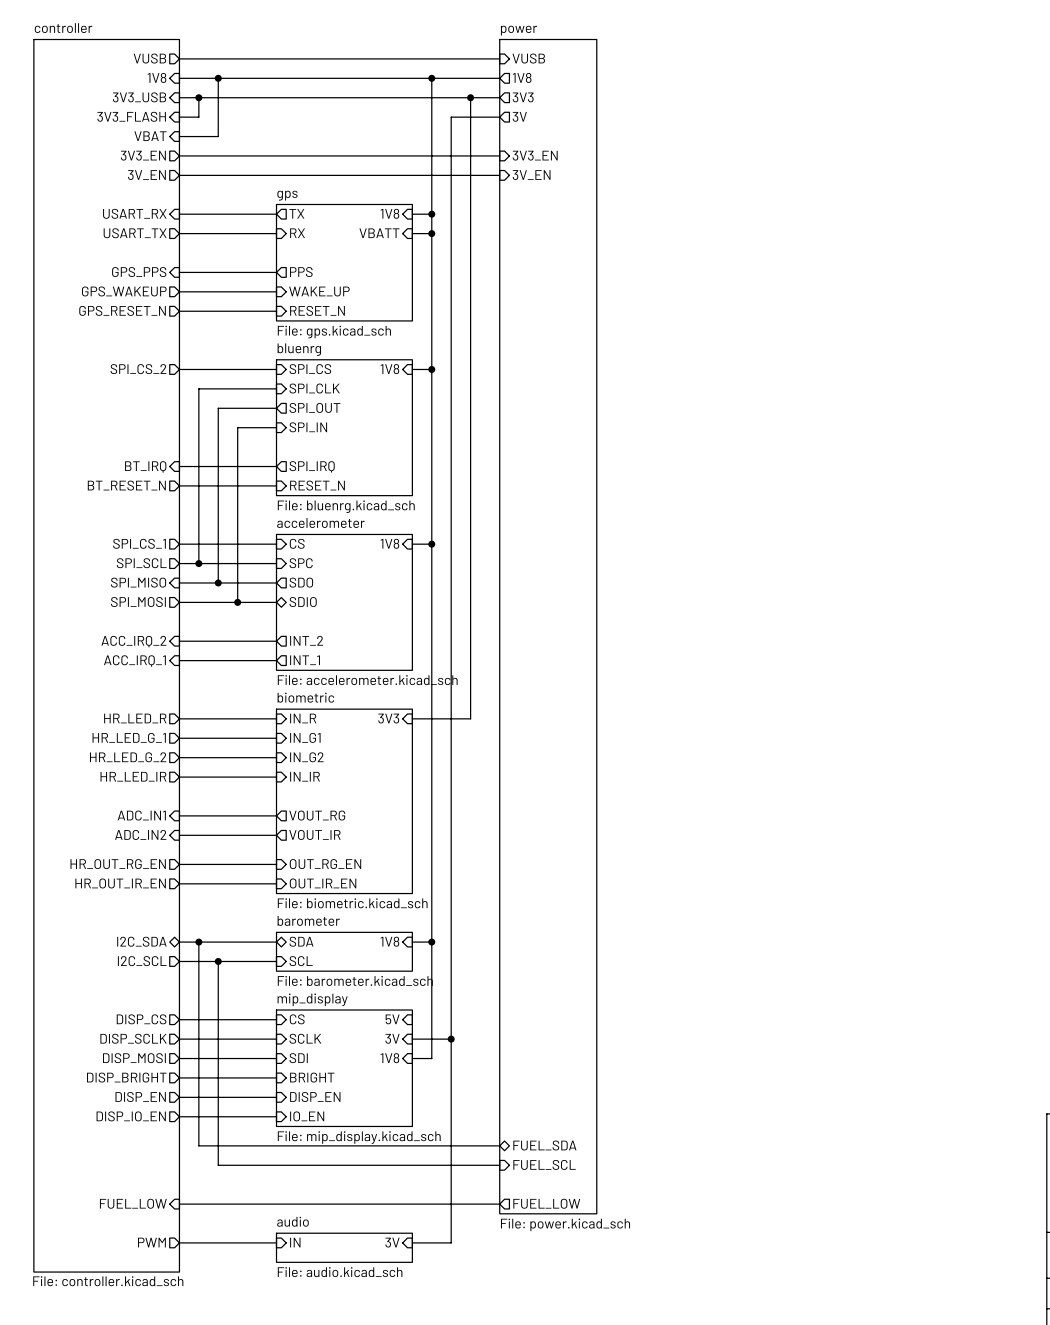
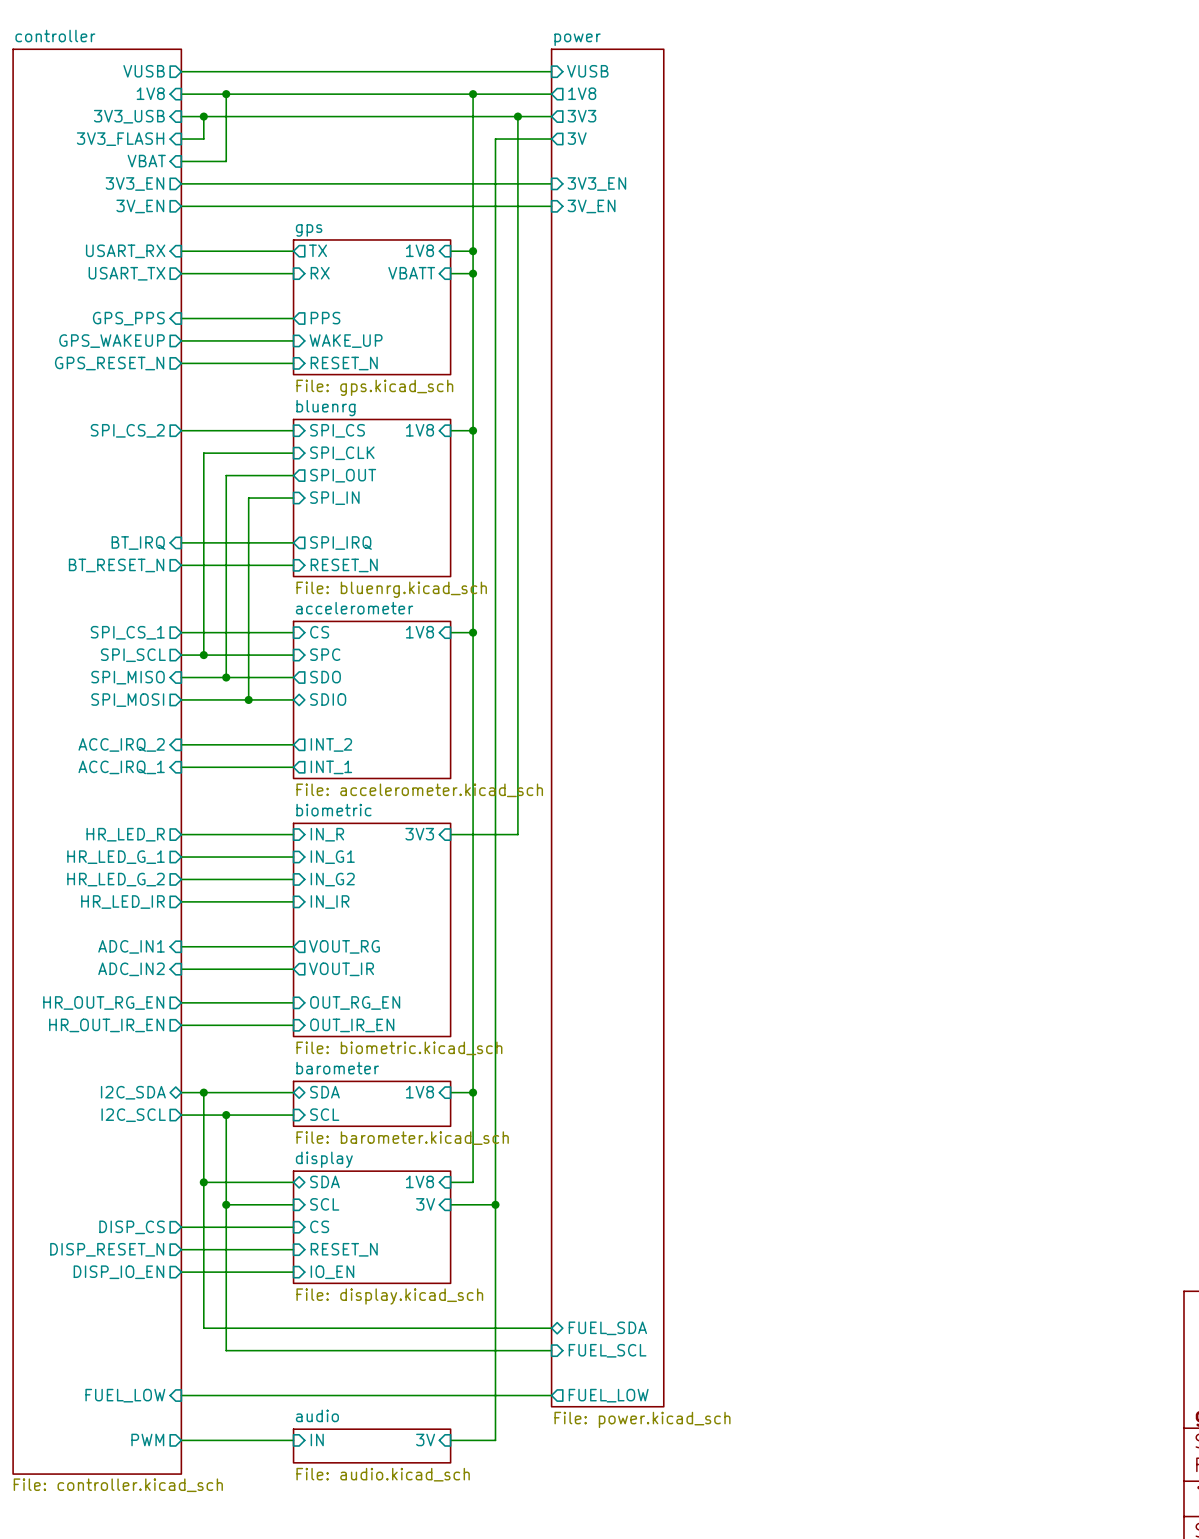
sheet pin: DISP_CS (141, 1019) -> none
wire: (179, 1019) (198, 1019) -> none
junction: none -> (203, 1182)
sheet pin shape: input (297, 1019) -> bidirectional (324, 1181)
sheet pin: CS (297, 1019) -> SDA (324, 1181)
sheet pin: 5V (392, 1019) -> 1V8 (419, 1181)
wire: (431, 1019) (431, 1058) (412, 1058) -> (473, 1182) (450, 1182)
sheet pin: DISP_SCLK (133, 1038) -> none
sheet pin: SCLK (305, 1038) -> SCL (324, 1204)
wire: (179, 1039) (218, 1039) -> none
junction: none -> (226, 1204)
sheet pin: DISP_MOSI (134, 1058) -> DISP_CS (132, 1227)
sheet pin: SDI (298, 1058) -> CS (319, 1226)
sheet display: none -> File: display.kicad_sch (372, 1227)
sheet pin: 1V8 (389, 1058) -> none
sheet mip_display: File: mip_display.kicad_sch (344, 1068) -> none
sheet pin: DISP_BRIGHT (126, 1077) -> DISP_RESET_N (107, 1249)
sheet pin: BRIGHT (312, 1077) -> RESET_N (344, 1249)
sheet pin: DISP_EN (140, 1096) -> DISP_IO_EN (118, 1272)
sheet pin: DISP_EN (315, 1096) -> IO_EN (332, 1272)
sheet pin: DISP_IO_EN (131, 1116) -> none
wire: (179, 1116) (276, 1116) -> none
sheet pin: IO_EN (307, 1116) -> none

